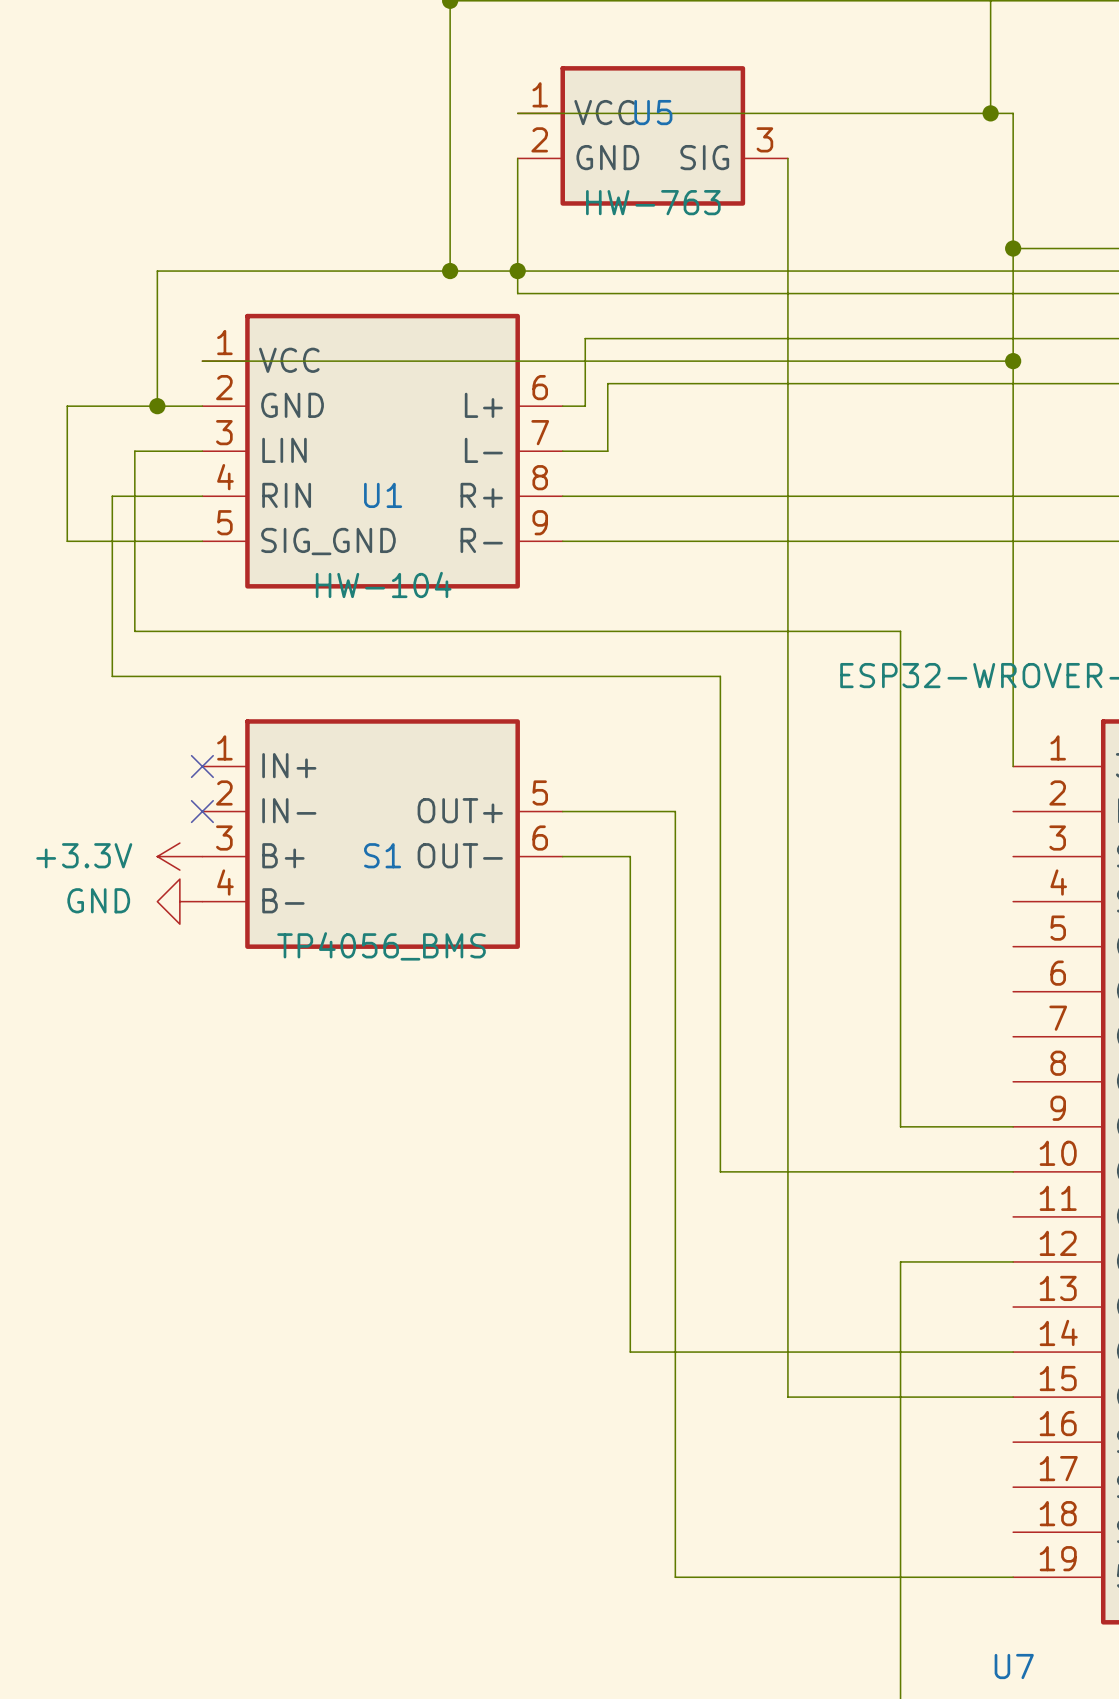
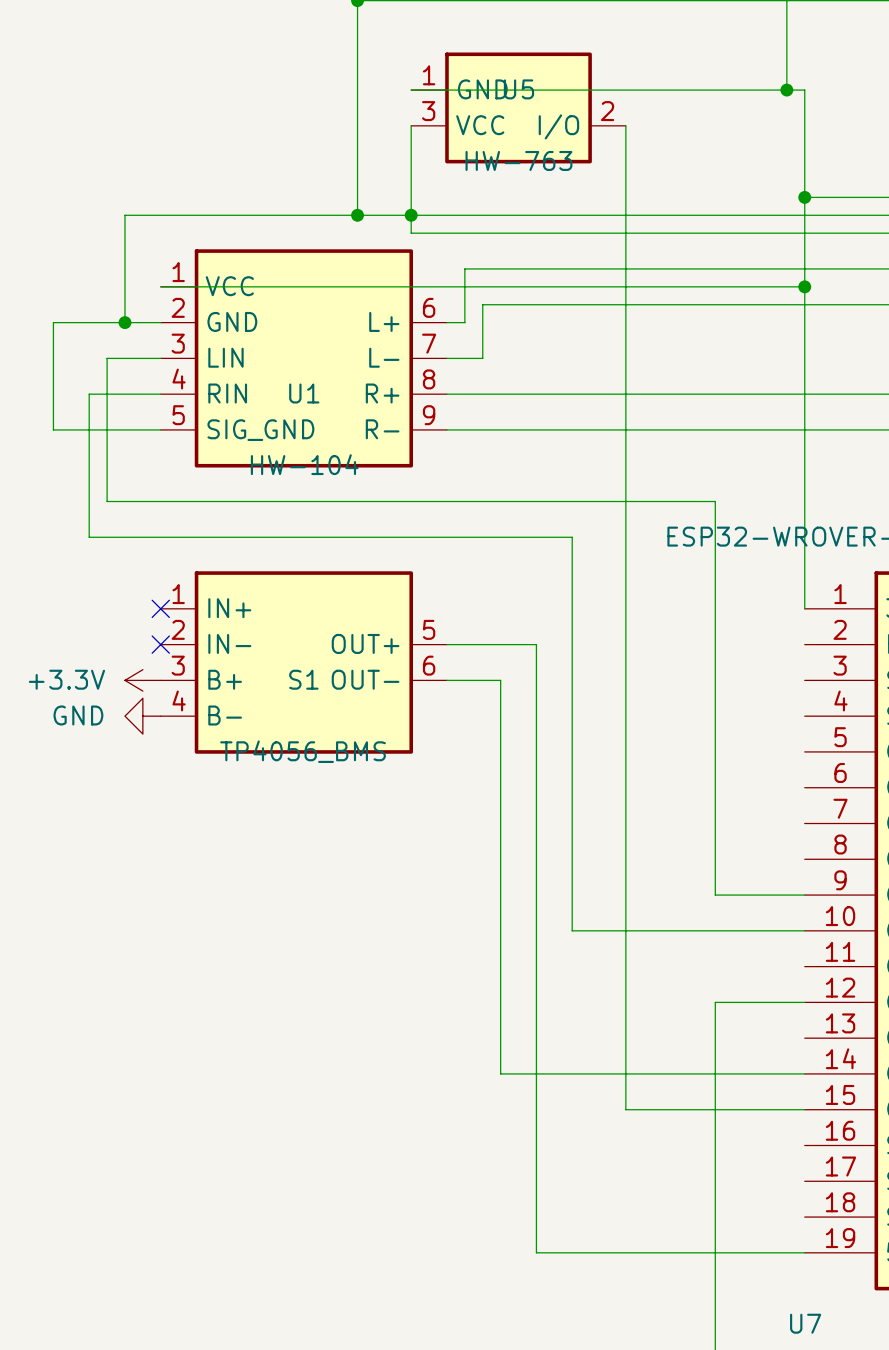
U5 pin name: VCC (604, 112) -> GND (482, 89)
U5 pin number: 2 (539, 139) -> 3 (428, 111)
U5 pin number: 3 (764, 139) -> 2 (607, 111)
U5 pin name: GND (607, 157) -> VCC (480, 125)
U5 pin name: SIG (704, 157) -> I/O (558, 126)

